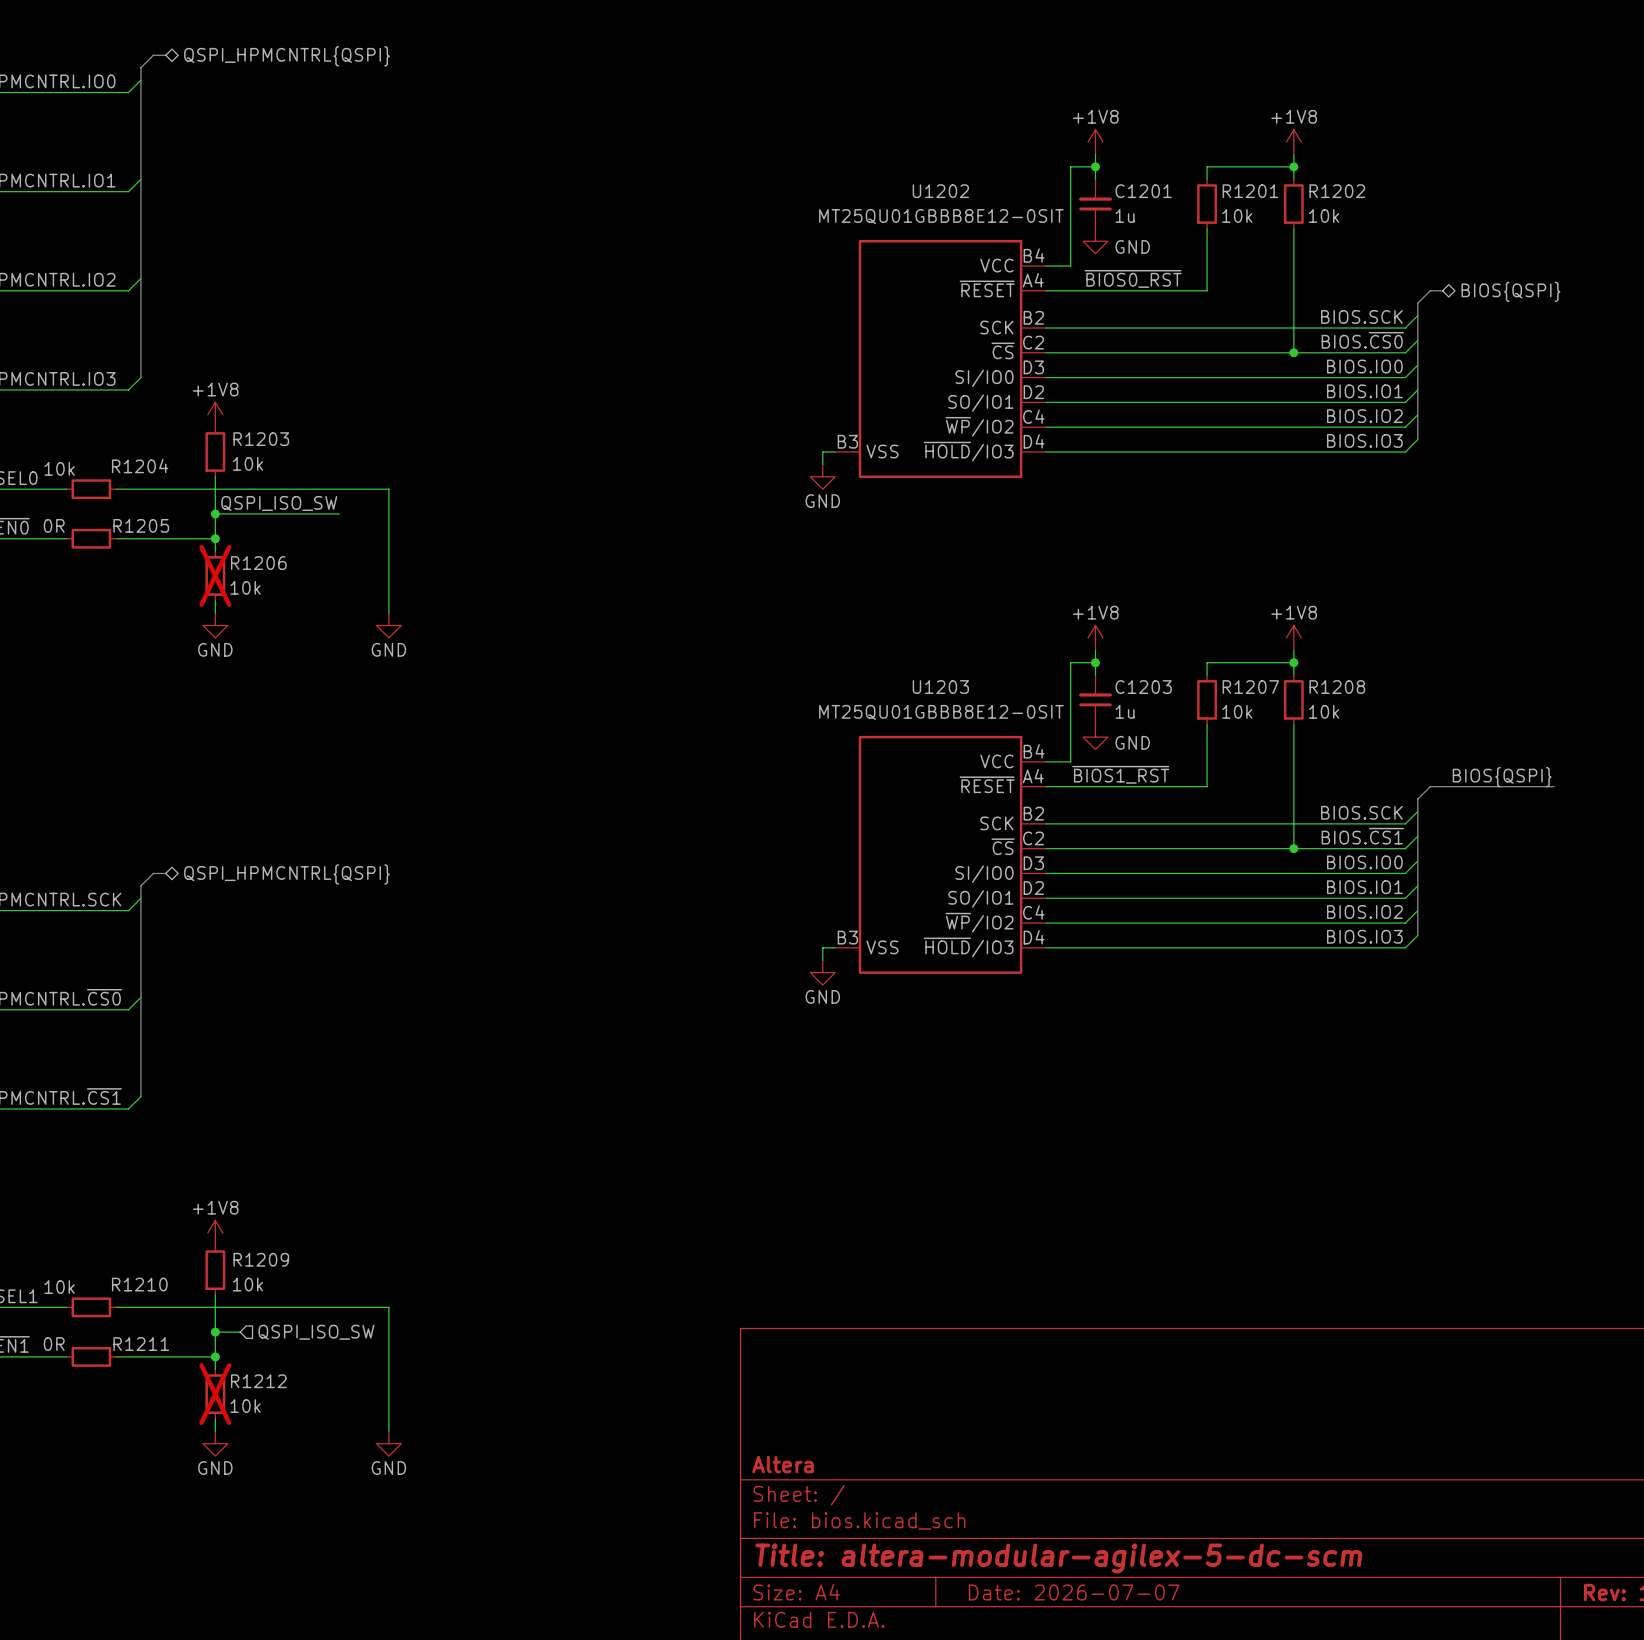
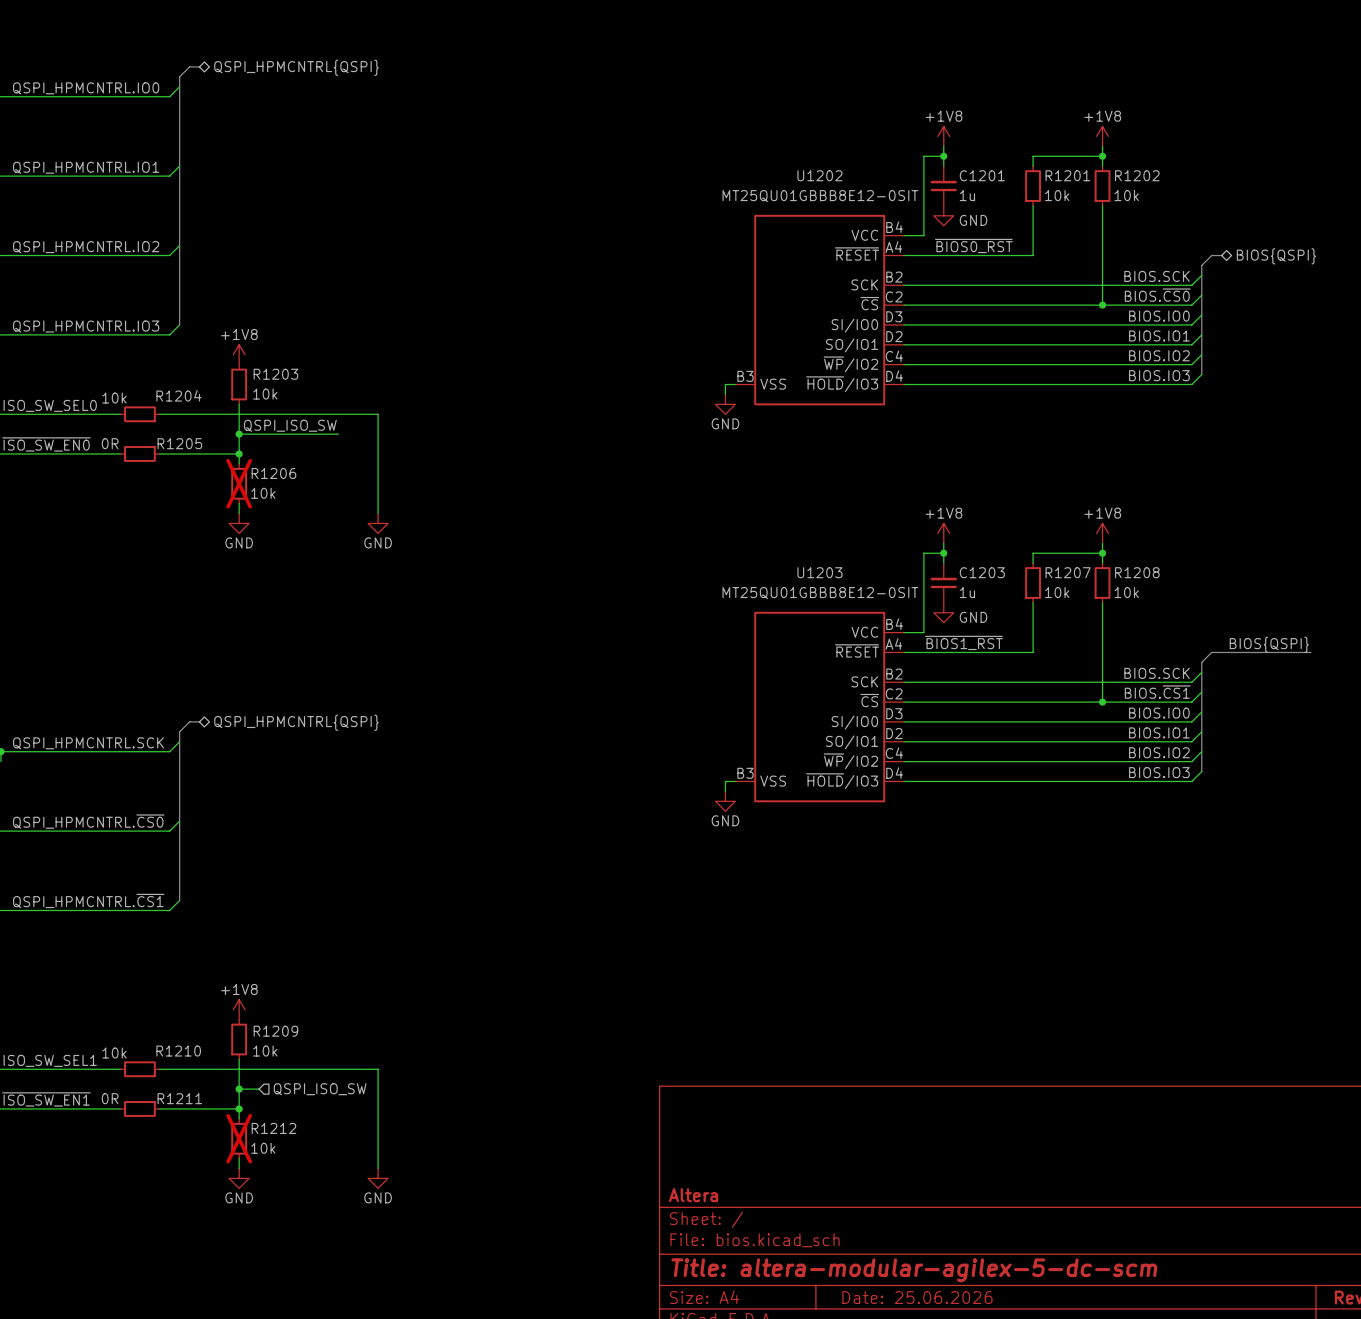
title block: Date: 2026-07-07 (1074, 1592) -> Date: 25.06.2026 (917, 1297)

